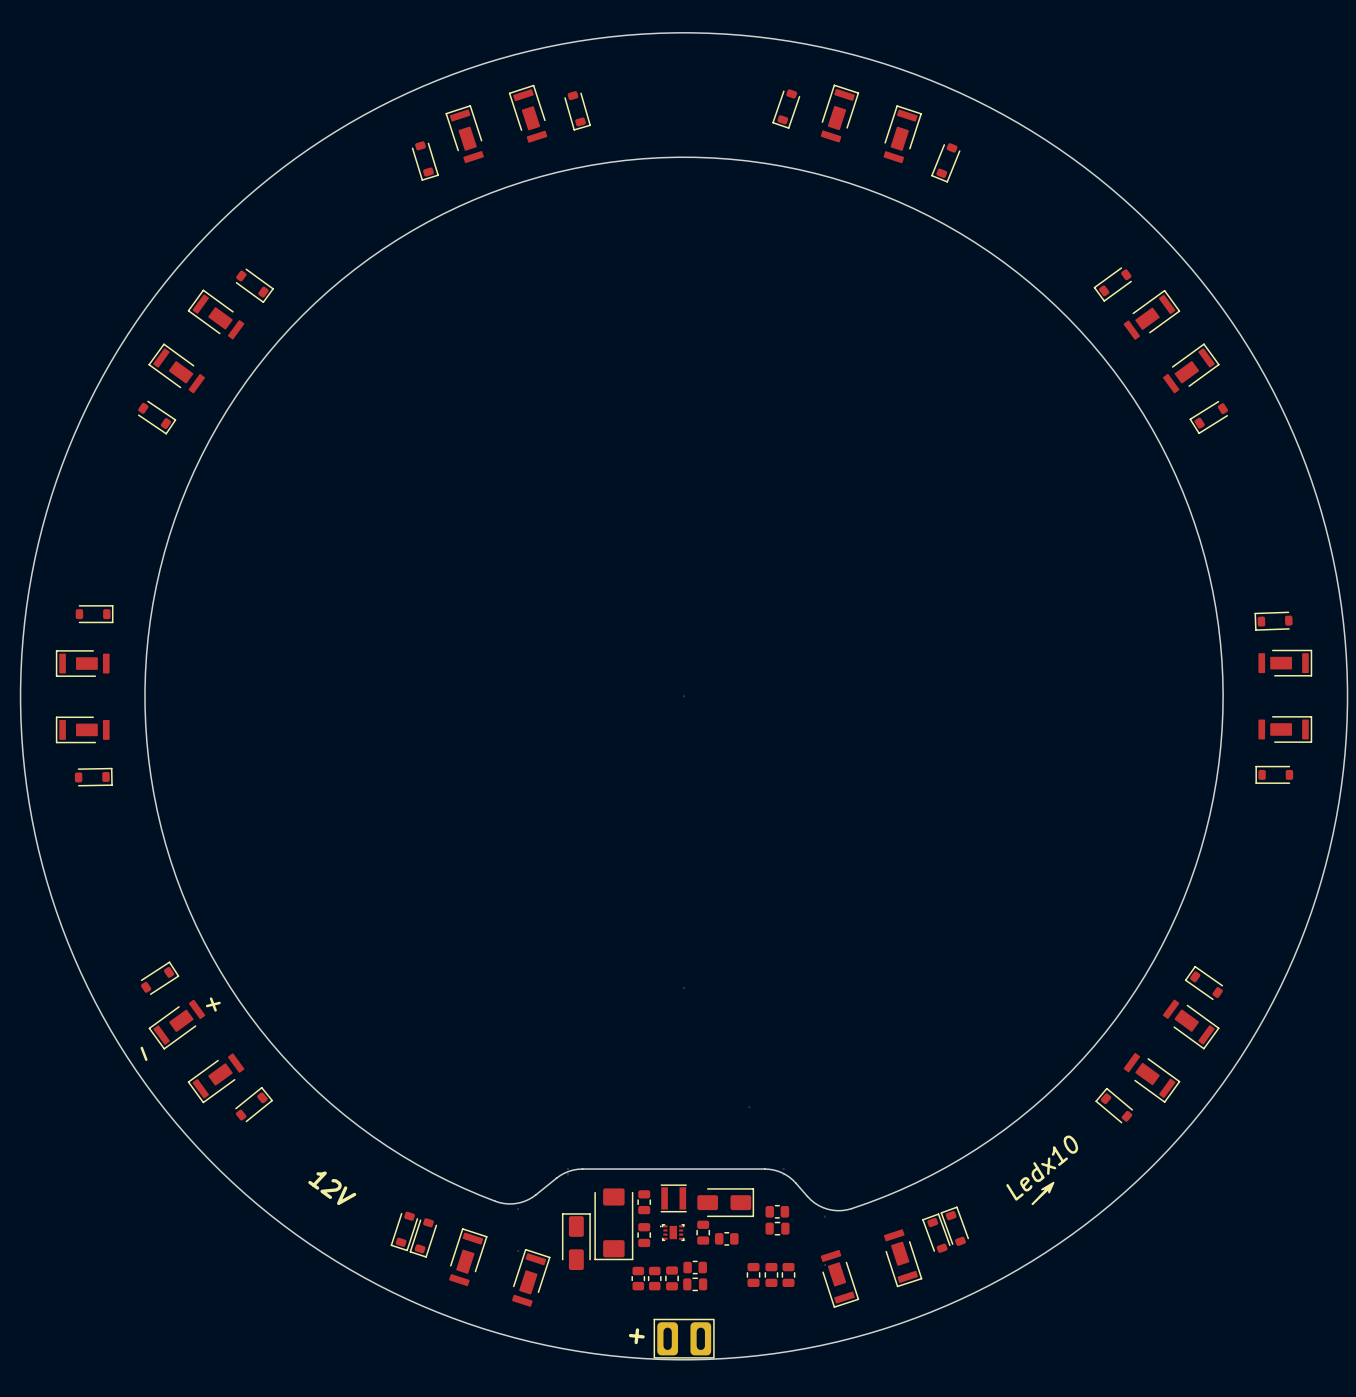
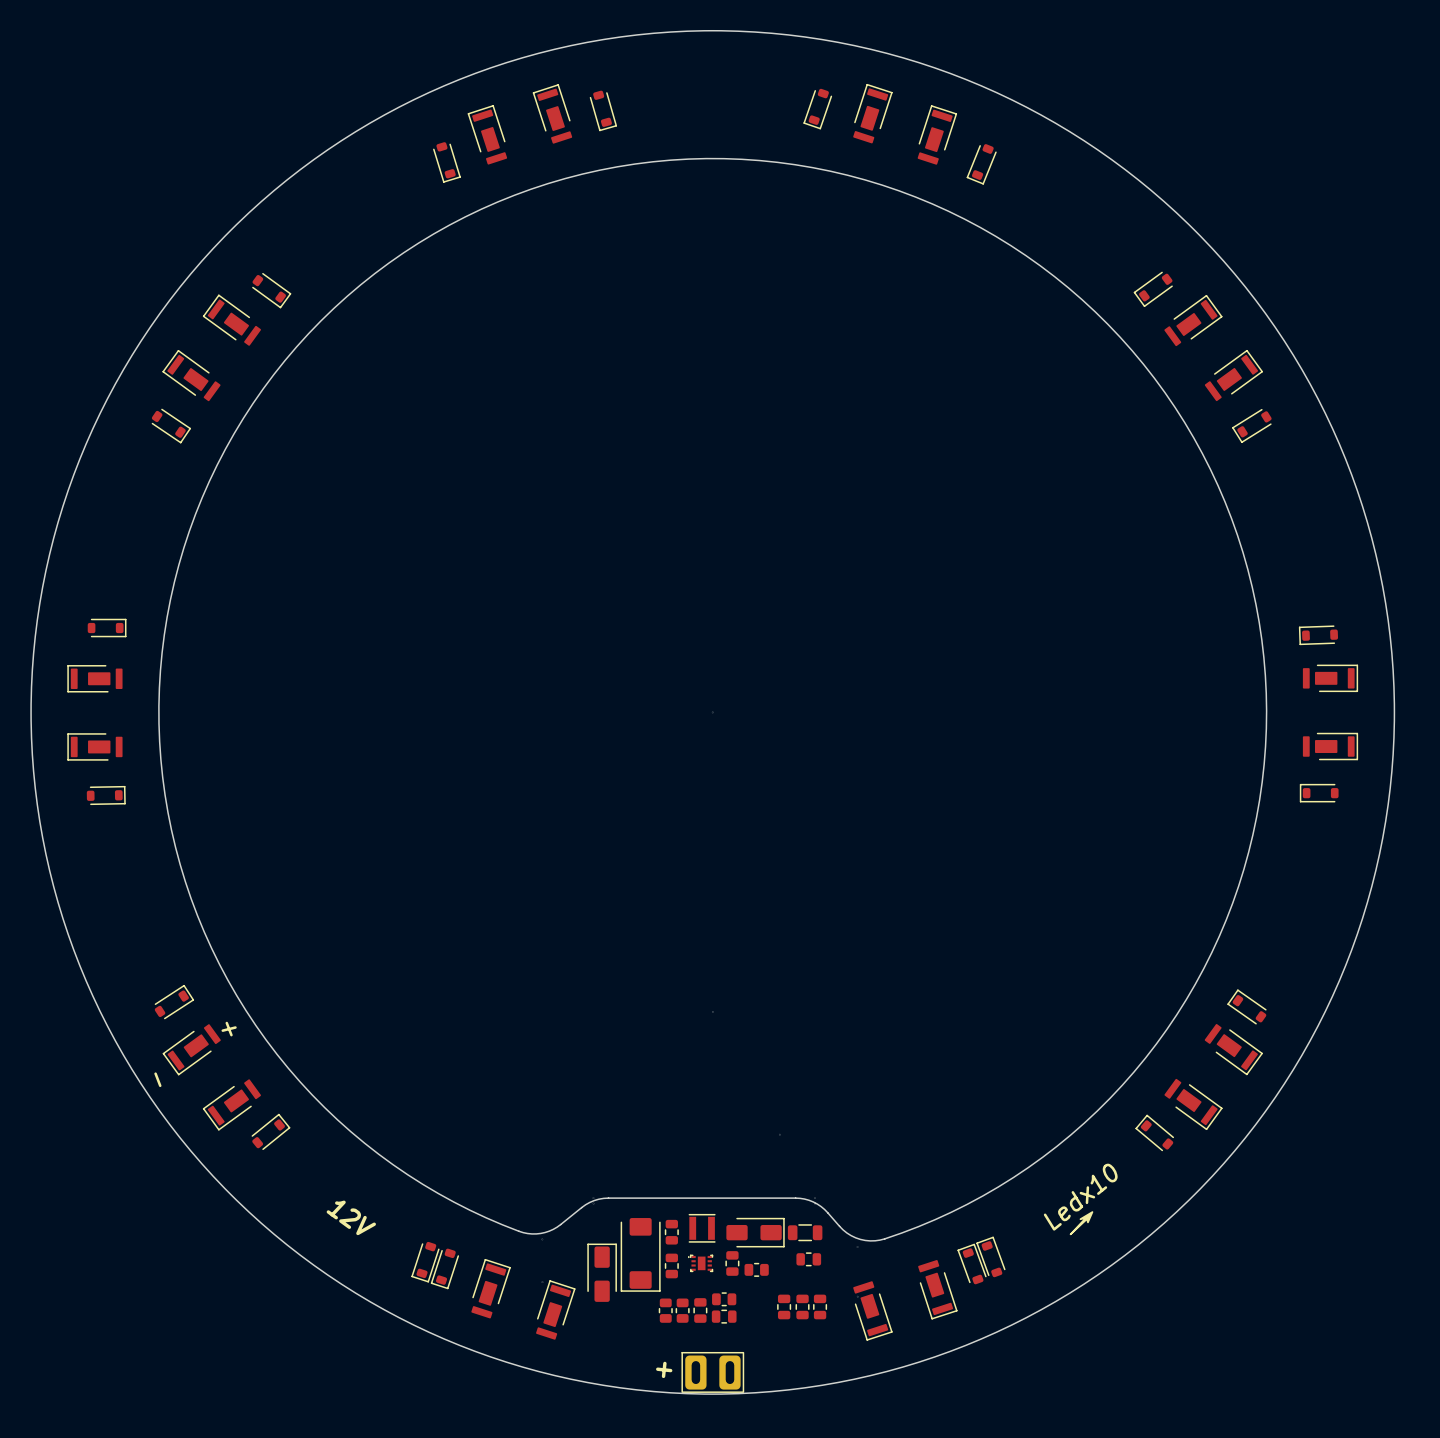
part: none -> (805, 1232)
part: (777, 1211) -> none

